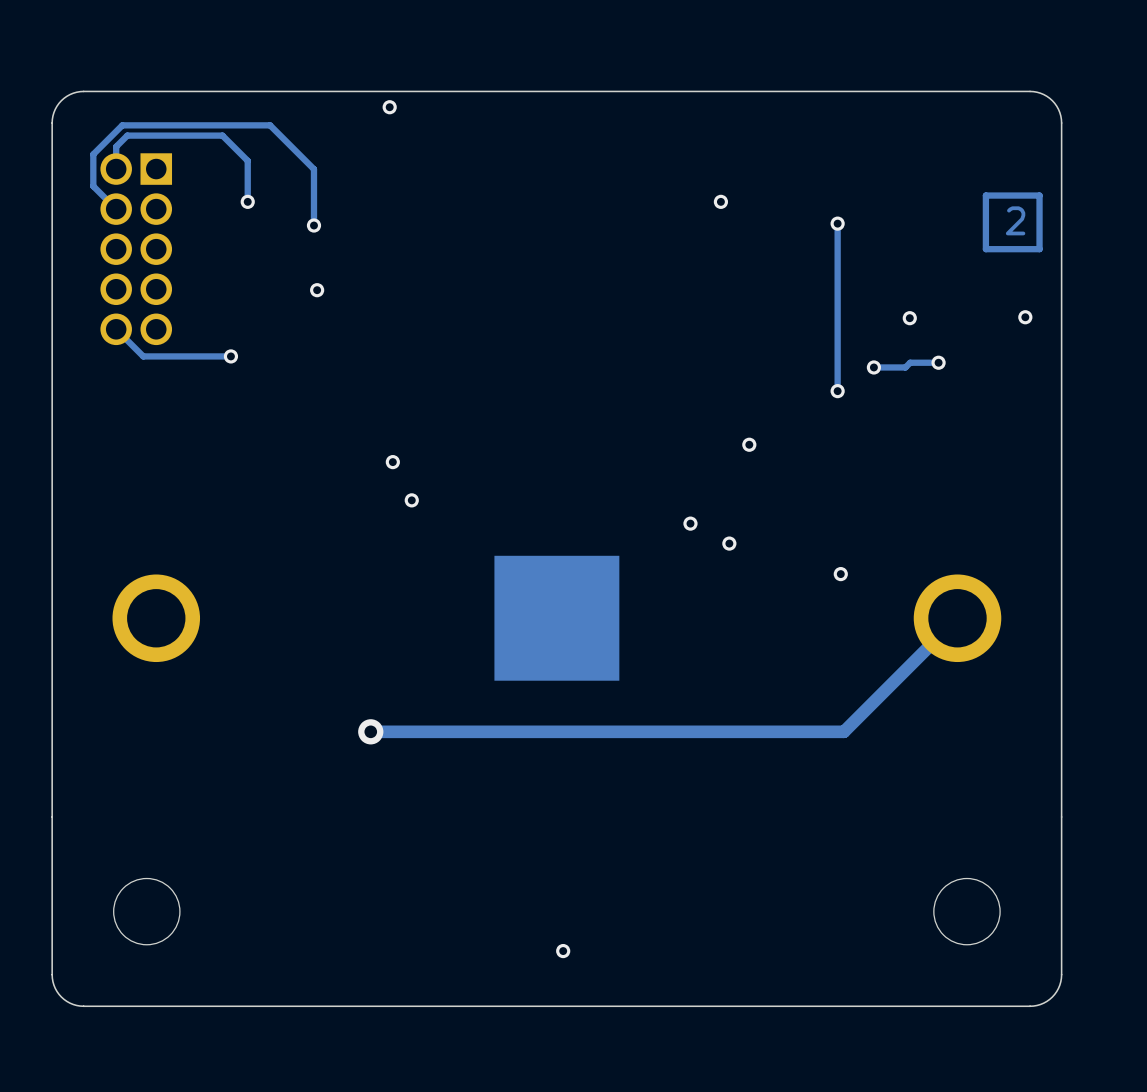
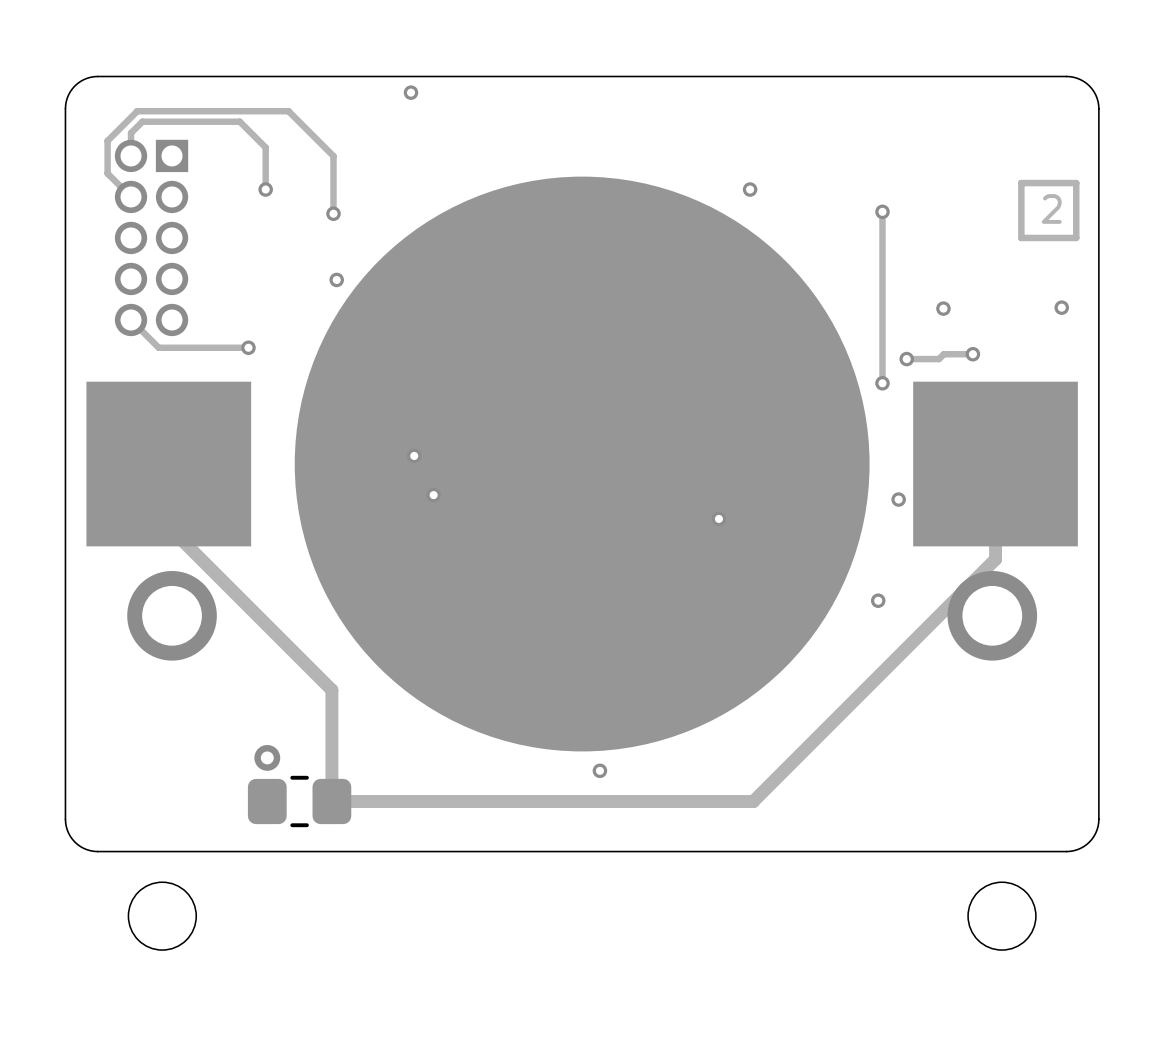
track: (837, 223) (837, 391) -> (882, 211) (882, 383)
via position: (837, 223) -> (882, 211)
via position: (837, 391) -> (882, 383)
via: (749, 444) -> none
part: none -> (582, 464)
track: none -> (995, 464) (995, 559) (753, 801) (331, 801) (331, 690) (168, 527) (168, 464)
via: none -> (898, 499)
via: (729, 543) -> none
via position: (840, 574) -> (878, 600)
track: (957, 618) (843, 731) (370, 731) -> none
via position: (370, 731) -> (267, 757)
via: none -> (599, 770)
part: none -> (299, 801)
board edge: (1061, 816) (1061, 978) (1058, 988) (1049, 999) (1040, 1004) (1030, 1006) (76, 1005) (61, 997) (55, 988) (52, 978) (52, 816) -> (1098, 819) (1095, 833) (1089, 842) (1077, 849) (1066, 851) (97, 851) (83, 848) (74, 842) (68, 833) (65, 819)
via: (563, 951) -> none

